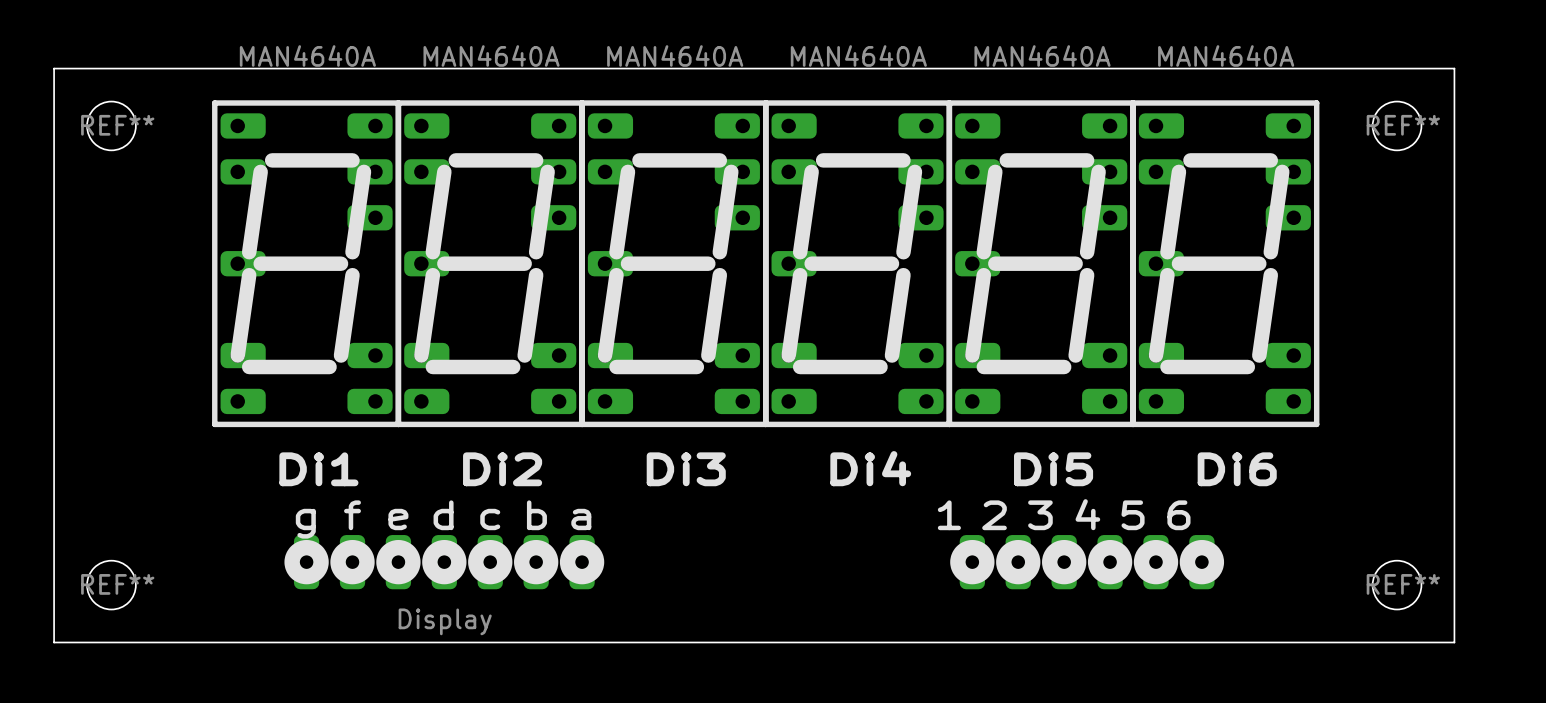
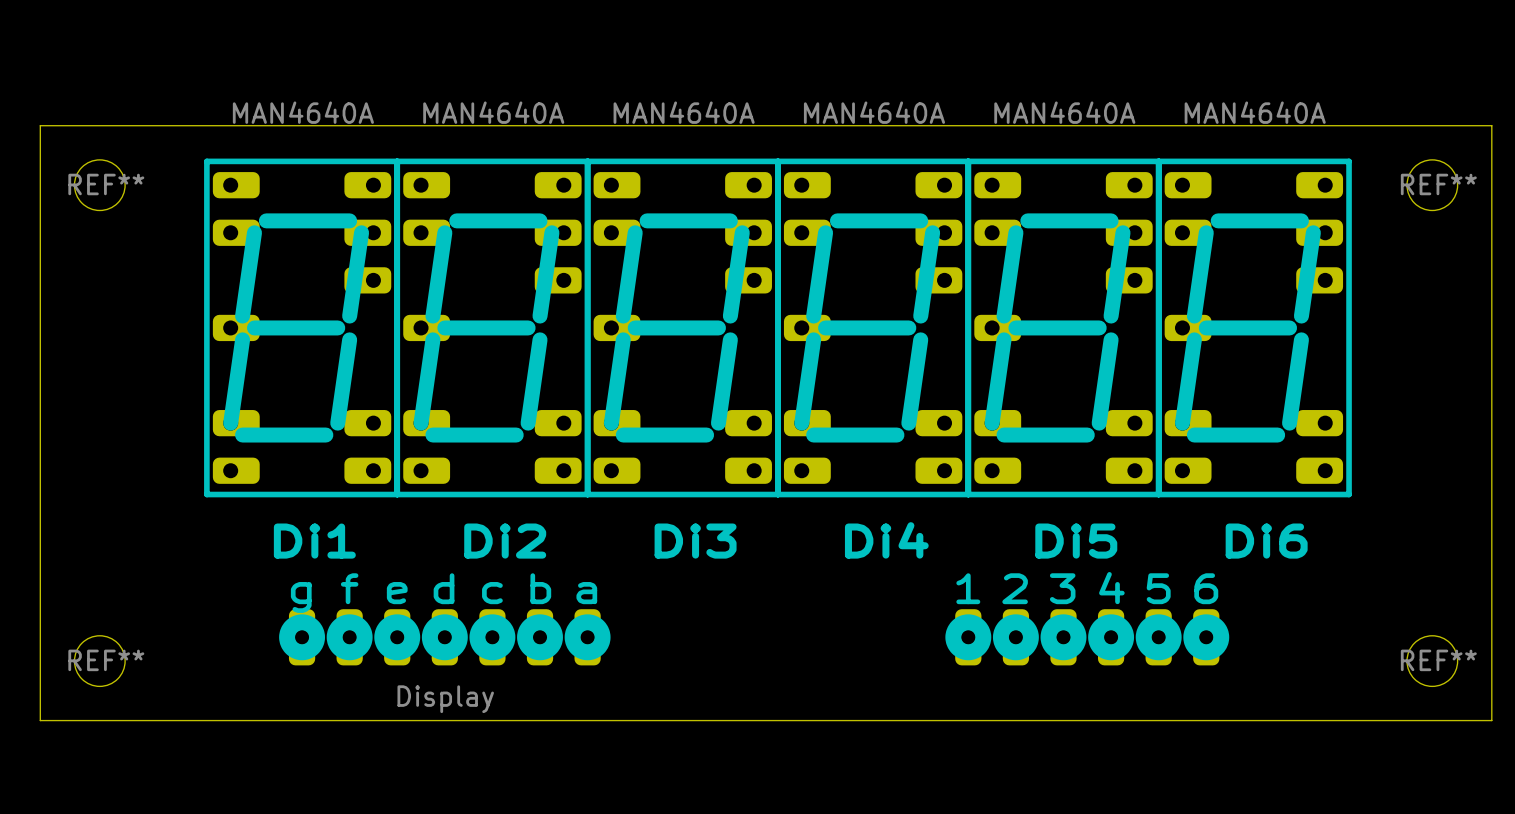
part footprint: [284, 535, 1225, 590] -> [279, 609, 1230, 666]

